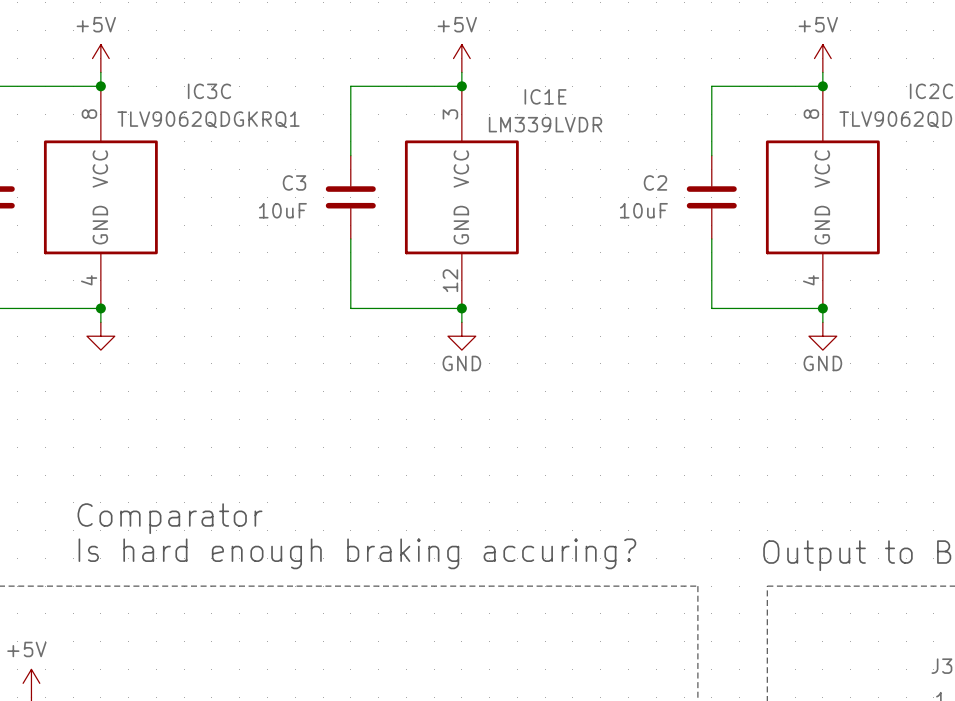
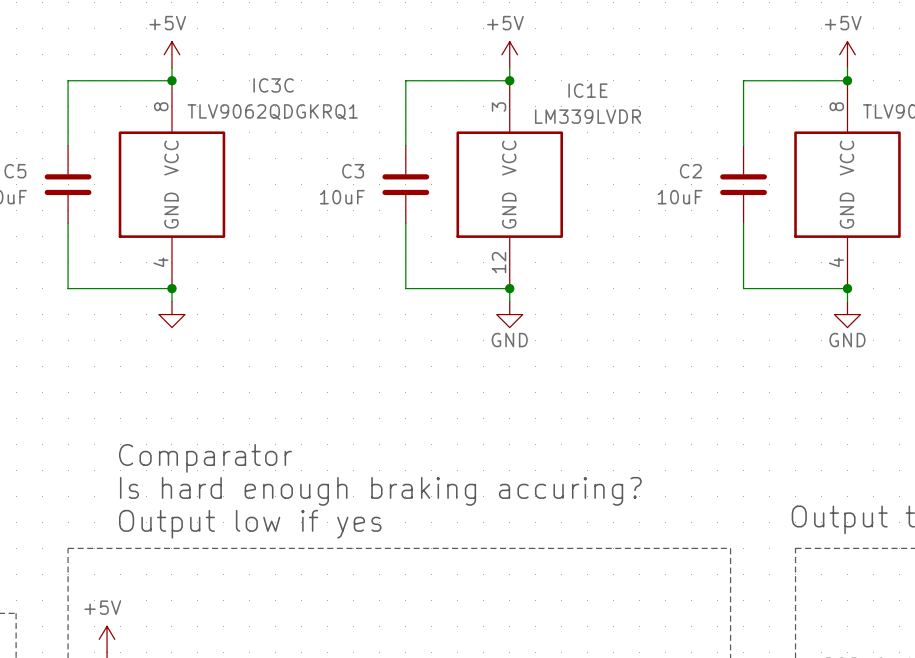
text position: Comparator (169, 518) -> Comparator (205, 458)
text position: Is hard enough braking accuring? (357, 553) -> Is hard enough braking accuring? (380, 491)
text: none -> Output low if yes (250, 524)

